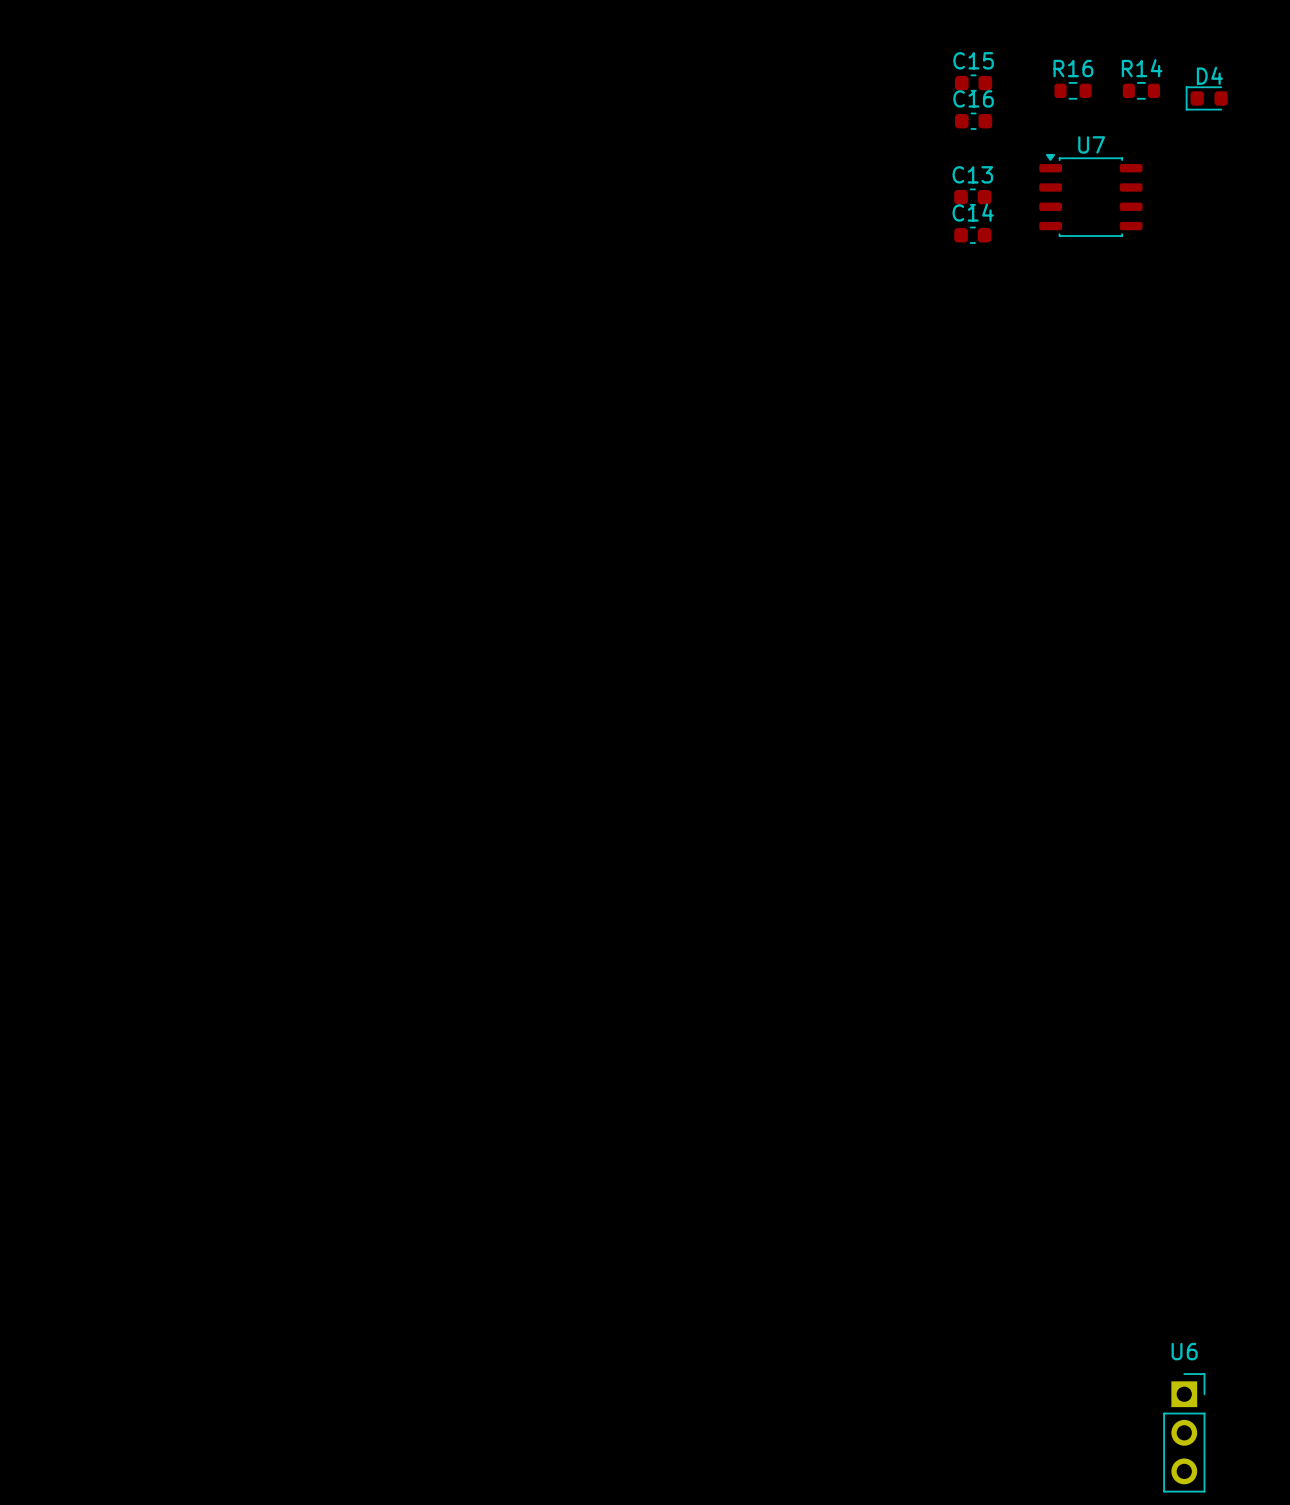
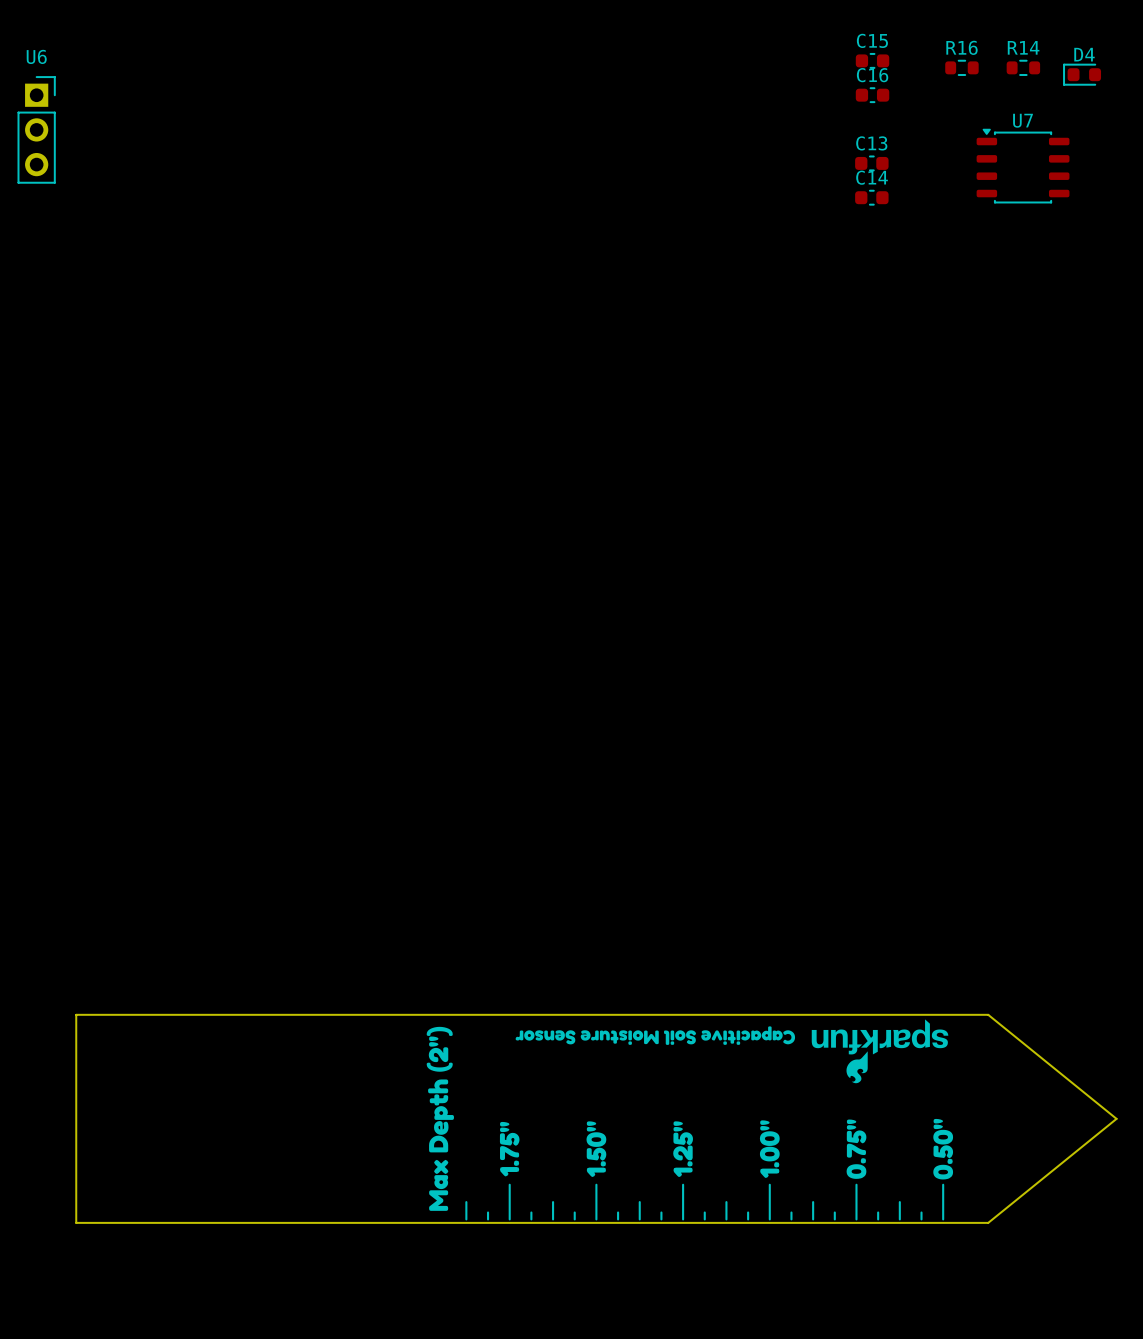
U7 position: (1090, 195) -> (1023, 166)
board edge: none -> (76, 1014) (76, 1222) (988, 1222) (1116, 1118) (988, 1014) (76, 1014)
drawing: none -> [811, 1019, 949, 1084]
drawing: none -> [426, 1026, 455, 1211]
drawing: none -> [515, 1026, 796, 1045]
drawing: none -> [846, 1119, 867, 1179]
drawing: none -> [933, 1118, 954, 1180]
drawing: none -> [759, 1120, 780, 1178]
drawing: none -> [586, 1121, 607, 1178]
drawing: none -> [673, 1121, 693, 1178]
drawing: none -> [499, 1121, 520, 1177]
line: none -> (509, 1184) (509, 1219)
line: none -> (596, 1184) (596, 1219)
line: none -> (683, 1184) (683, 1219)
line: none -> (769, 1184) (769, 1219)
line: none -> (856, 1184) (856, 1219)
line: none -> (943, 1184) (943, 1219)
line: none -> (466, 1202) (466, 1219)
line: none -> (553, 1202) (553, 1219)
line: none -> (639, 1202) (639, 1219)
line: none -> (726, 1202) (726, 1219)
line: none -> (813, 1202) (813, 1219)
line: none -> (899, 1202) (899, 1219)
line: none -> (488, 1212) (488, 1219)
line: none -> (531, 1212) (531, 1219)
line: none -> (574, 1212) (574, 1219)
line: none -> (618, 1212) (618, 1219)
line: none -> (661, 1212) (661, 1219)
line: none -> (704, 1212) (704, 1219)
line: none -> (748, 1212) (748, 1219)
line: none -> (791, 1212) (791, 1219)
line: none -> (834, 1212) (834, 1219)
line: none -> (878, 1212) (878, 1219)
line: none -> (921, 1212) (921, 1219)
U6 position: (1184, 1432) -> (36, 129)

